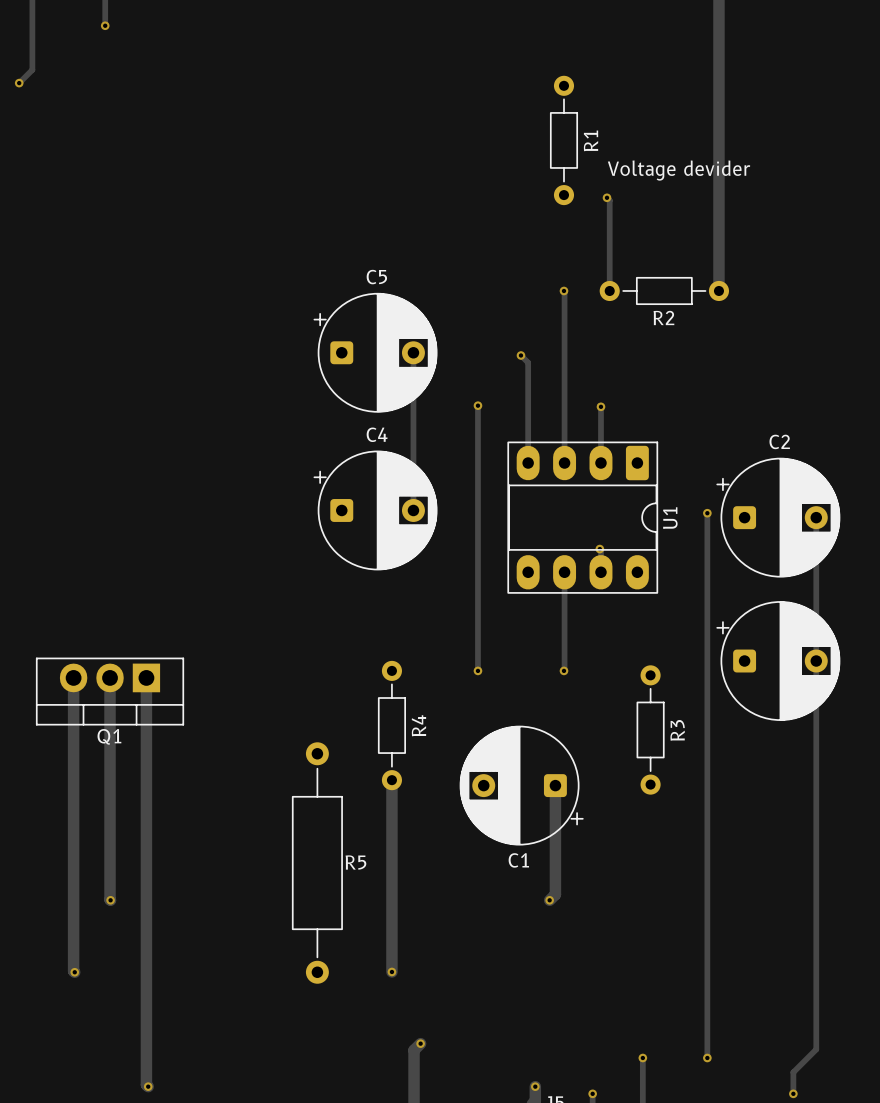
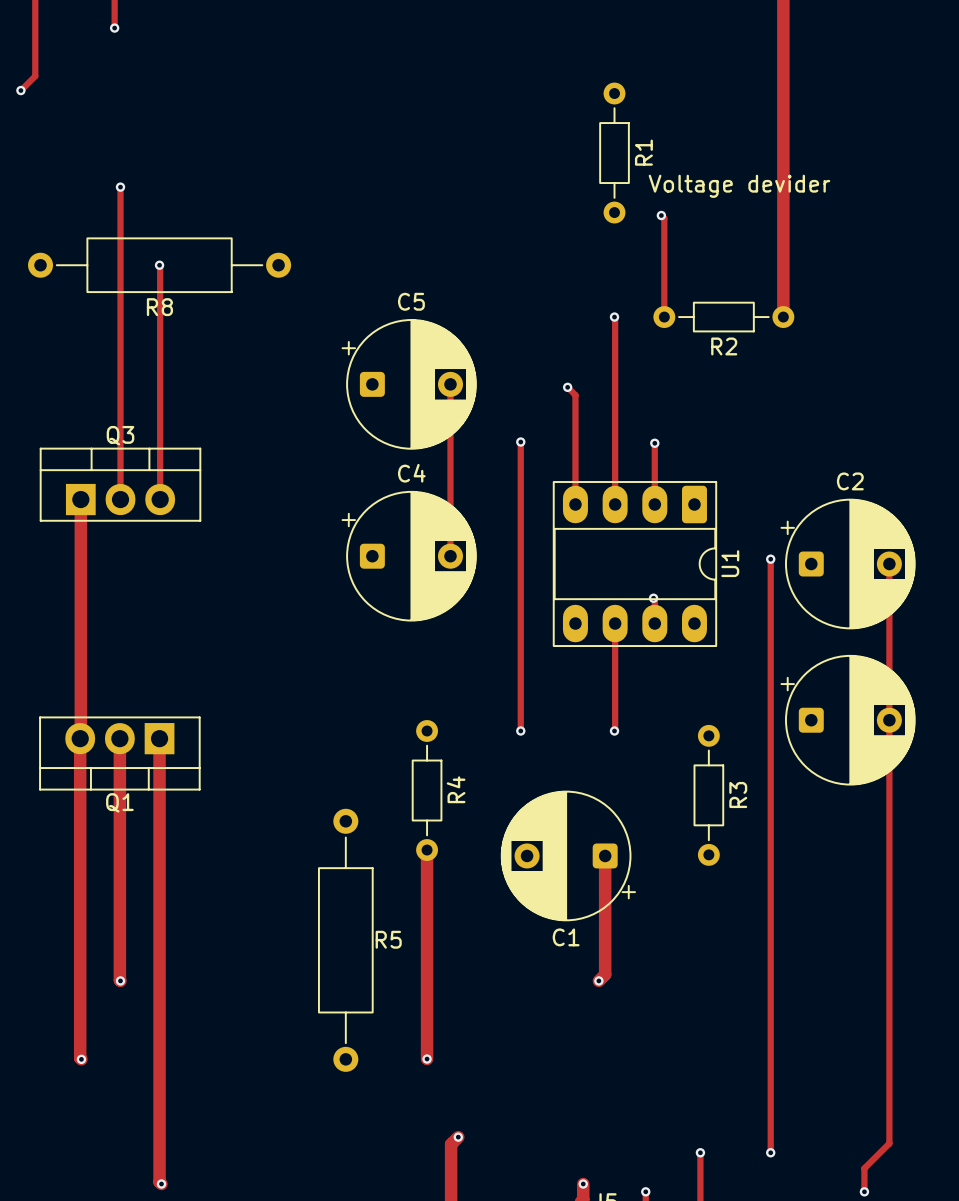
track: none -> (120, 187) (120, 499)
via: none -> (120, 187)
track: none -> (159, 265) (160, 499)
R8: none -> (159, 265)
via: none -> (159, 265)
Q3: none -> (120, 484)
track: none -> (80, 499) (80, 738)

